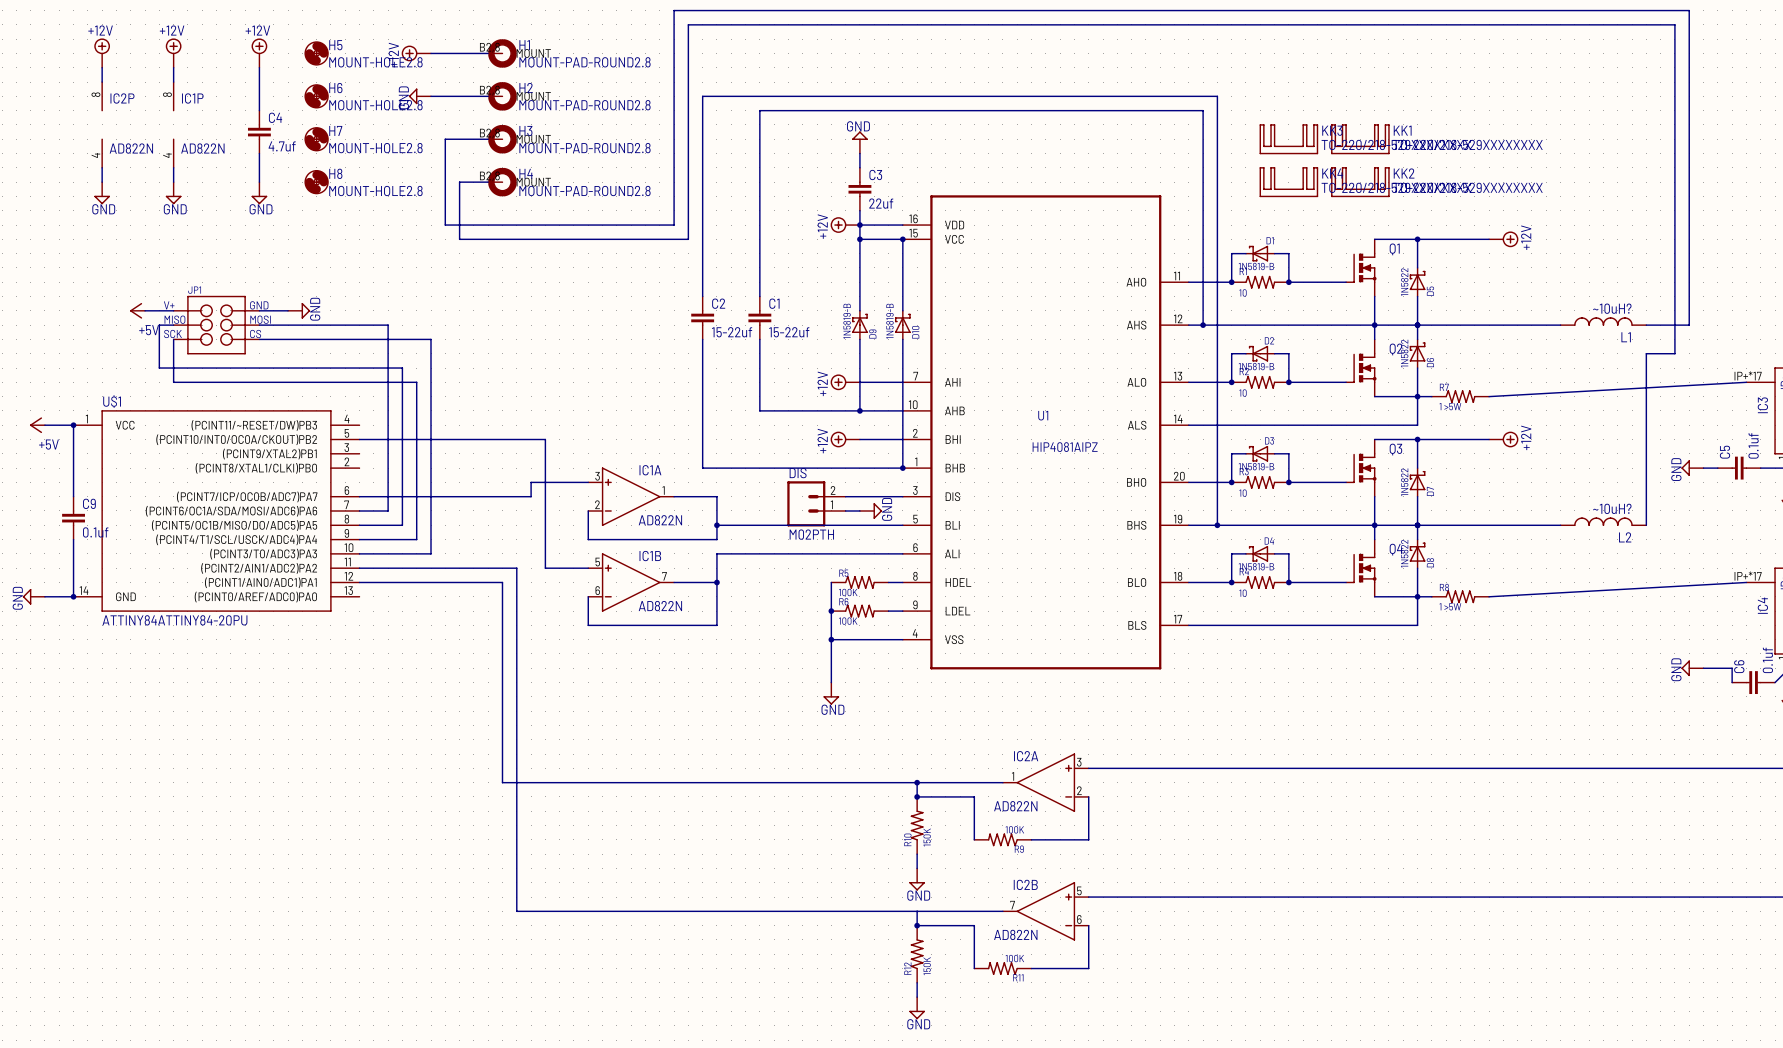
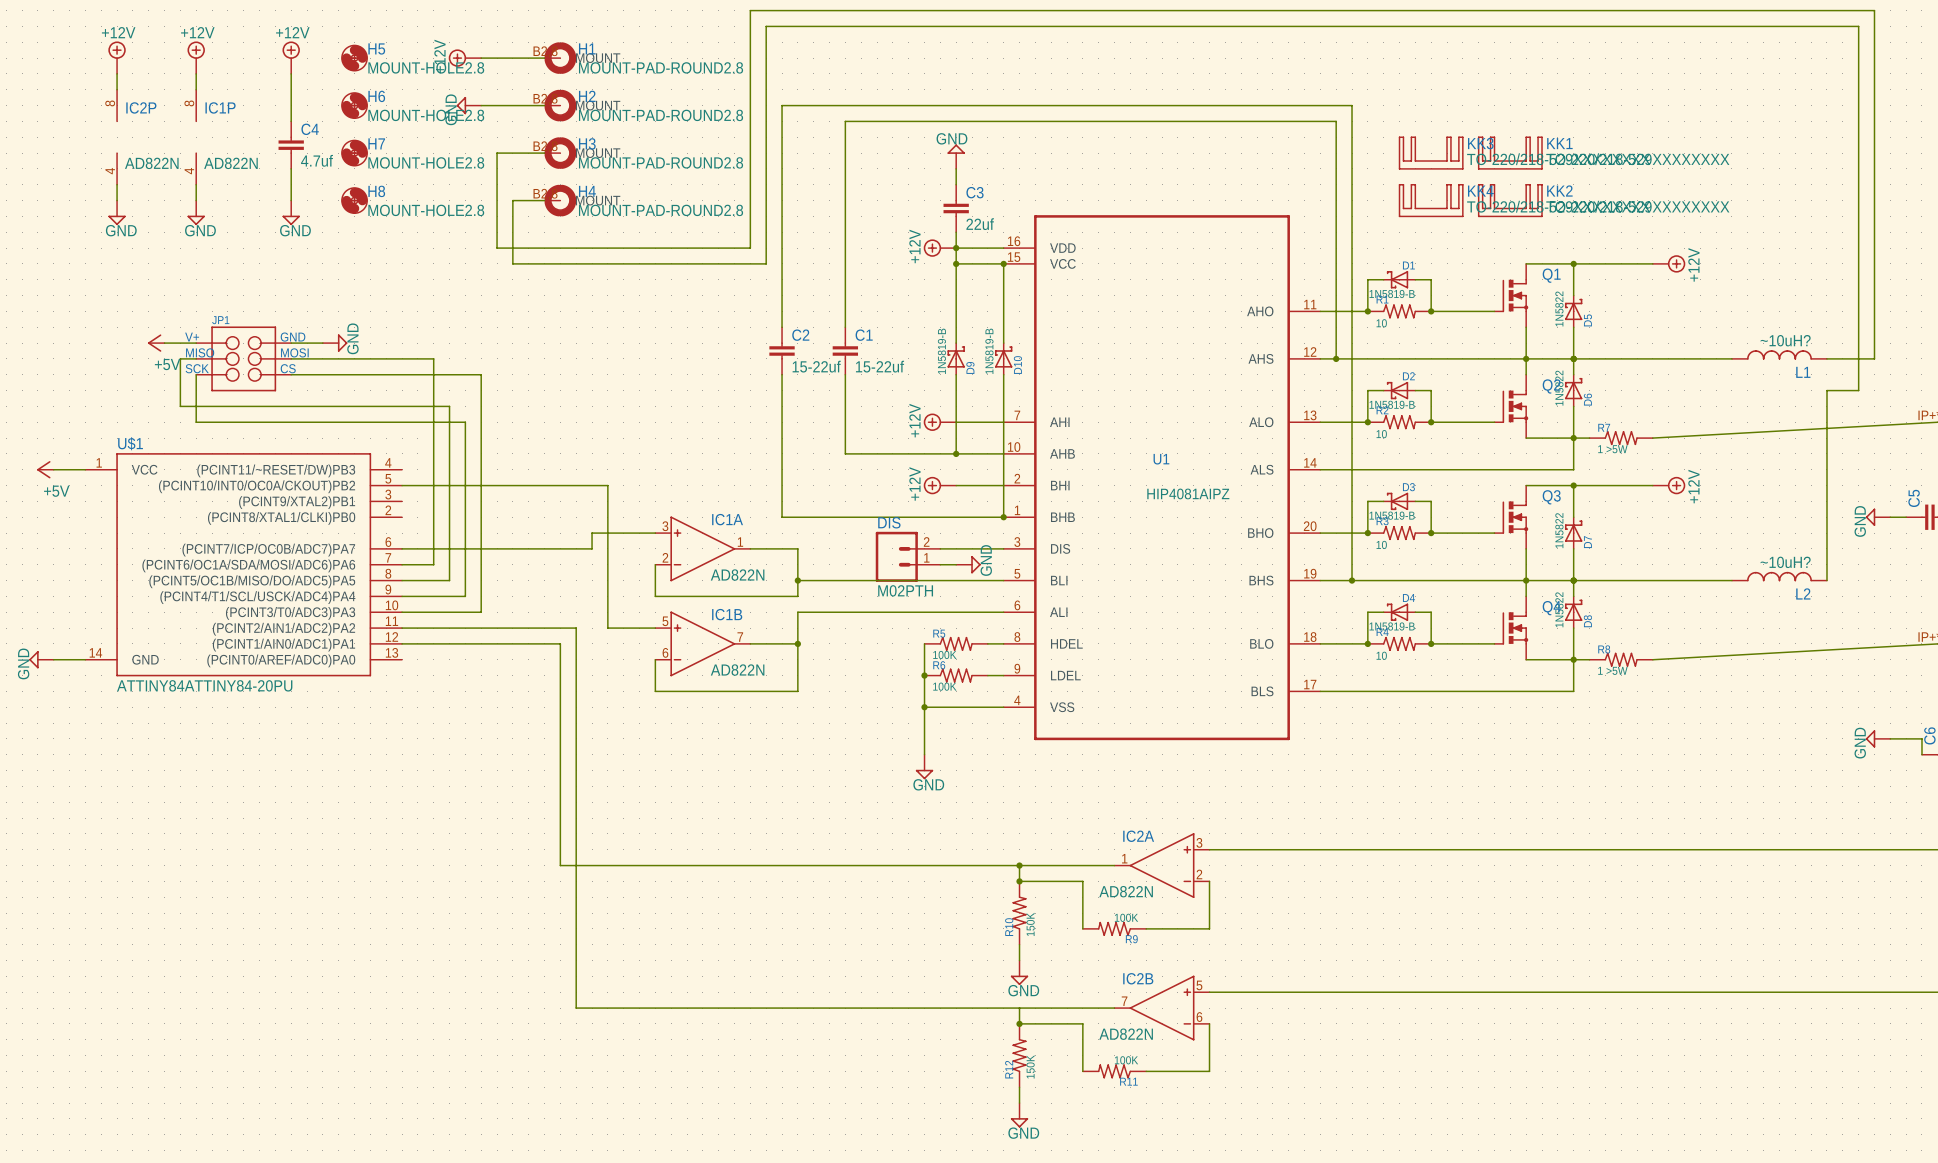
wire: (73, 425) (73, 496) -> none
junction: (73, 425) -> none
C9: 0.1uf (73, 518) -> none
wire: (73, 539) (73, 596) -> none
junction: (73, 596) -> none

